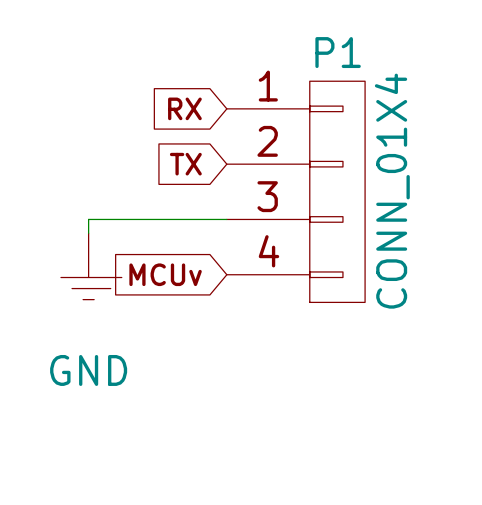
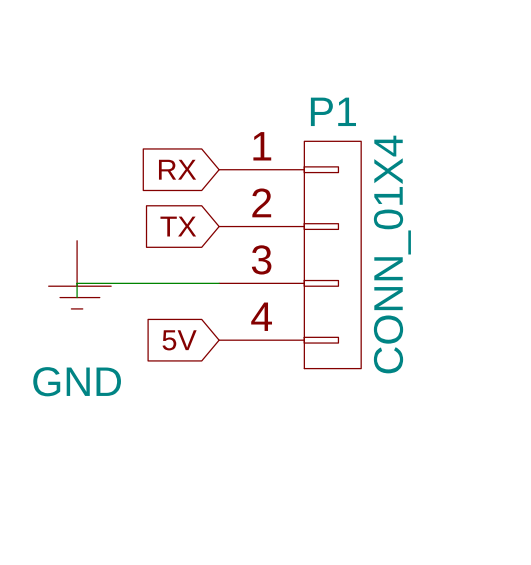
power symbol position: GND (91, 266) -> GND (79, 274)
global label: MCUv (165, 274) -> 5V (179, 340)

